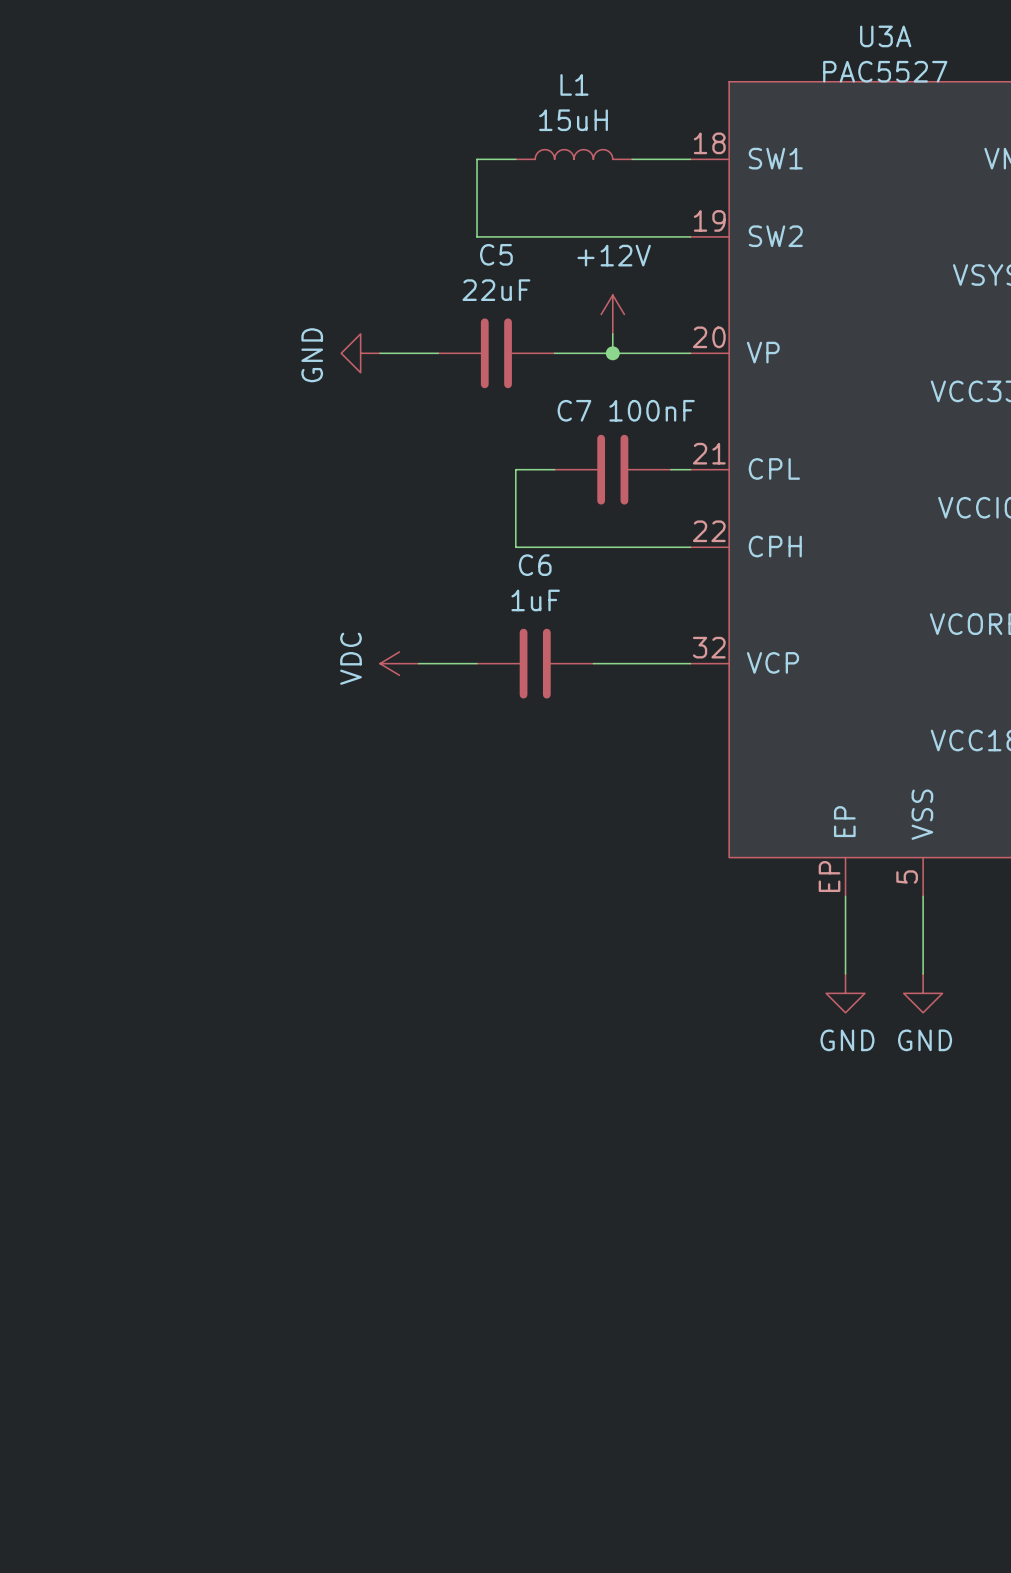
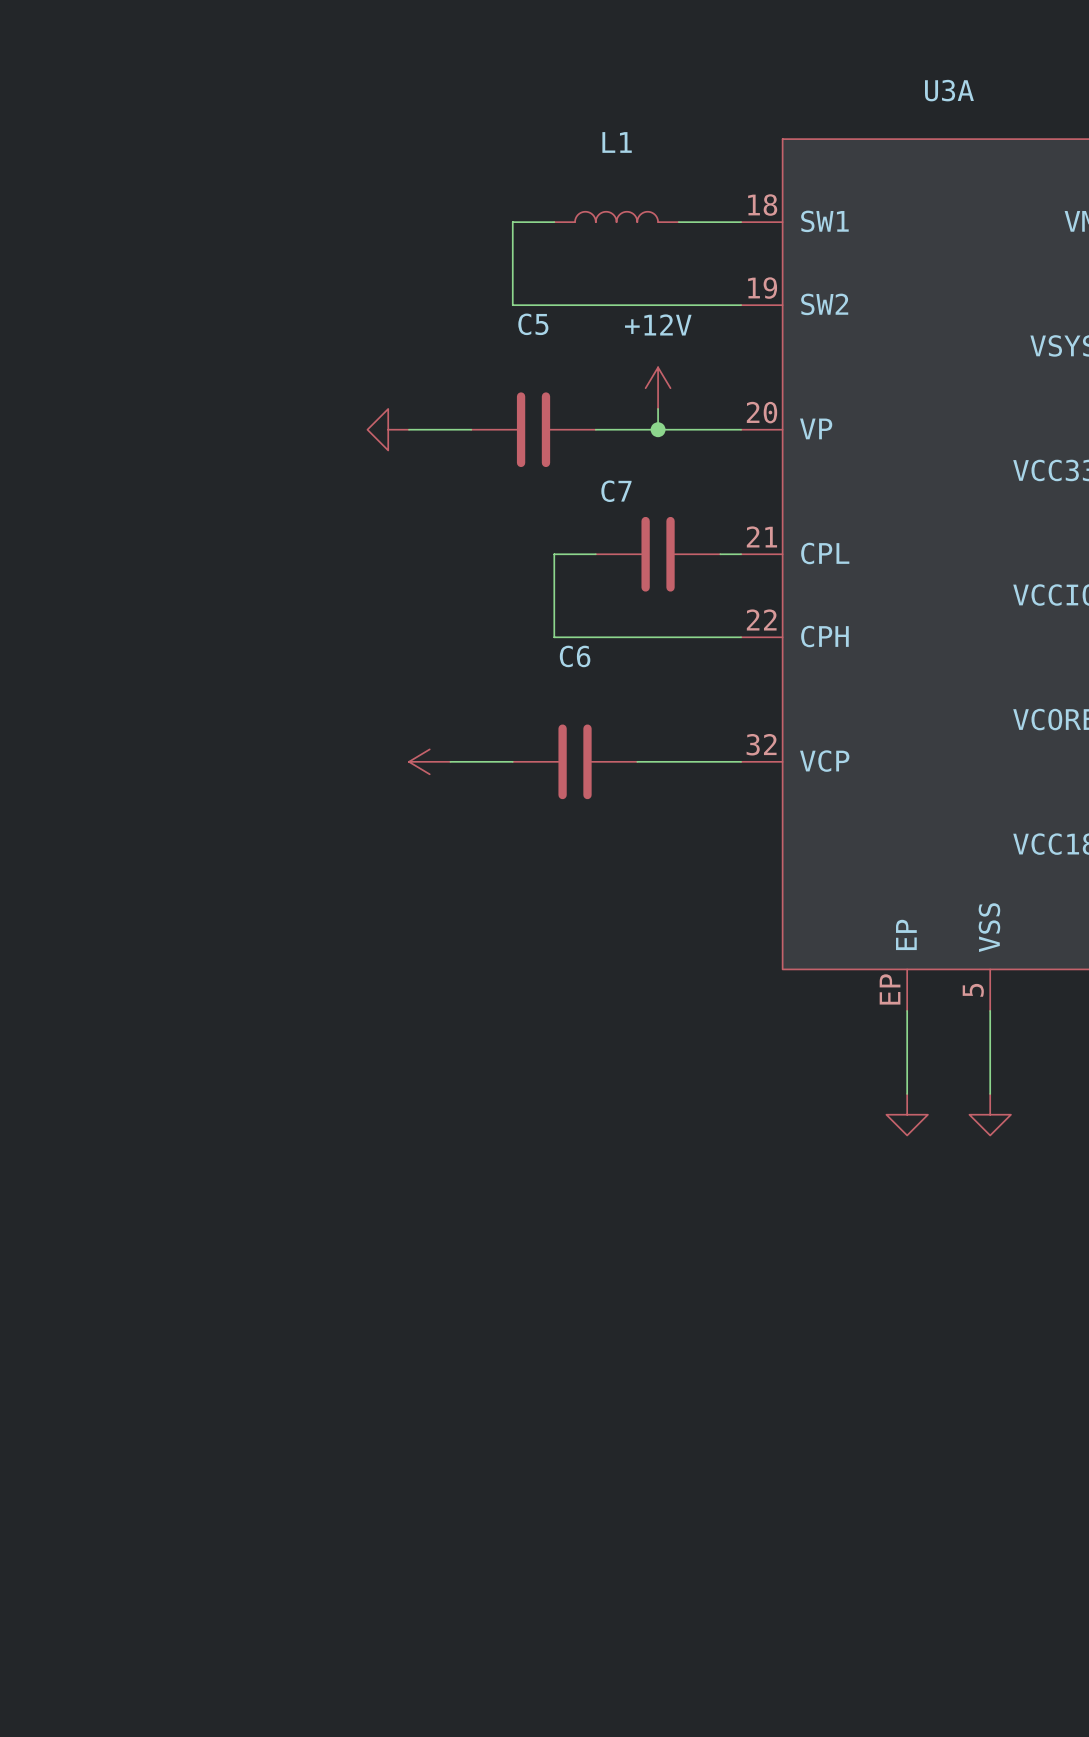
U3A value: PAC5527 (885, 71) -> none
L1 value: 15uH (573, 120) -> none
C5 value: 22uF (496, 290) -> none
power symbol text: GND (312, 355) -> none
C7 value: 100nF (652, 410) -> none
C6 value: 1uF (535, 600) -> none
power symbol text: VDC (350, 658) -> none
power symbol text: GND (847, 1040) -> none
power symbol text: GND (925, 1040) -> none

